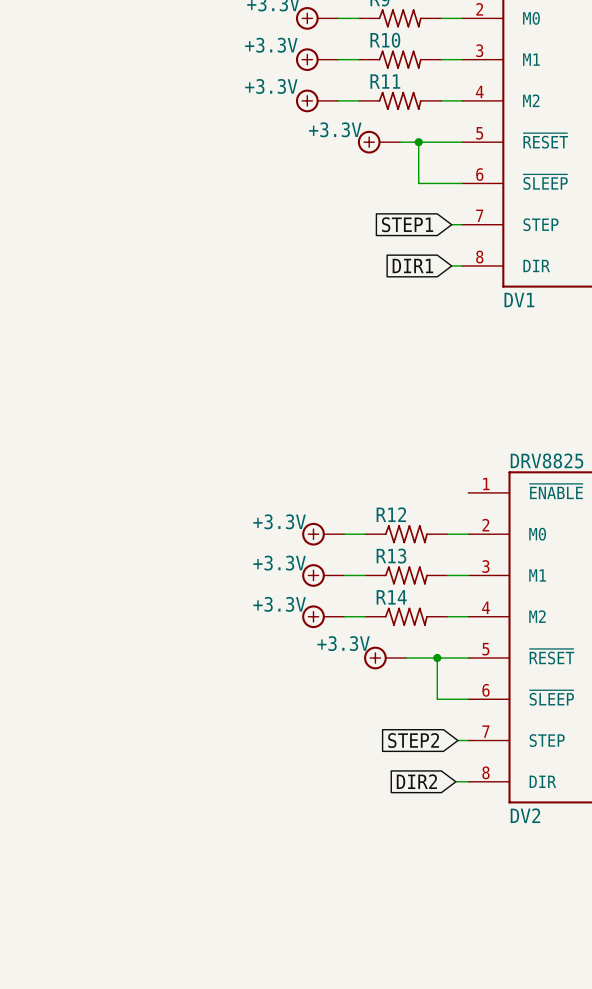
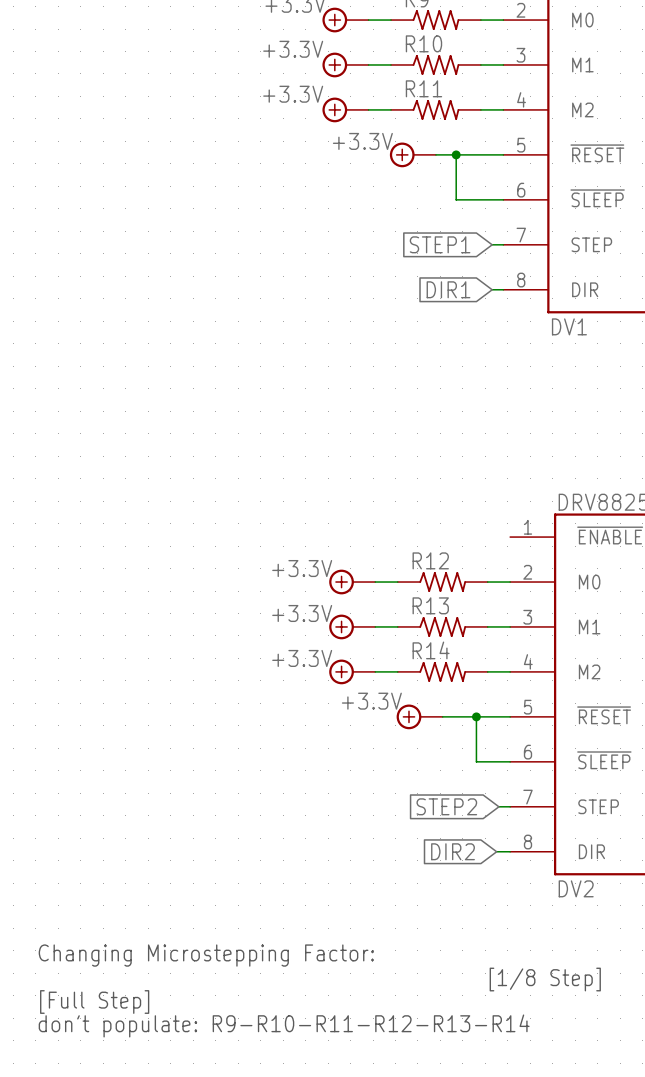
text: none -> Changing Microstepping Factor: (206, 955)
text: none -> [1/8 Step] (545, 979)
text: none -> [Full Step] (94, 1002)
text: none -> don't populate: R9-R10-R11-R12-R13-R14 (284, 1025)

